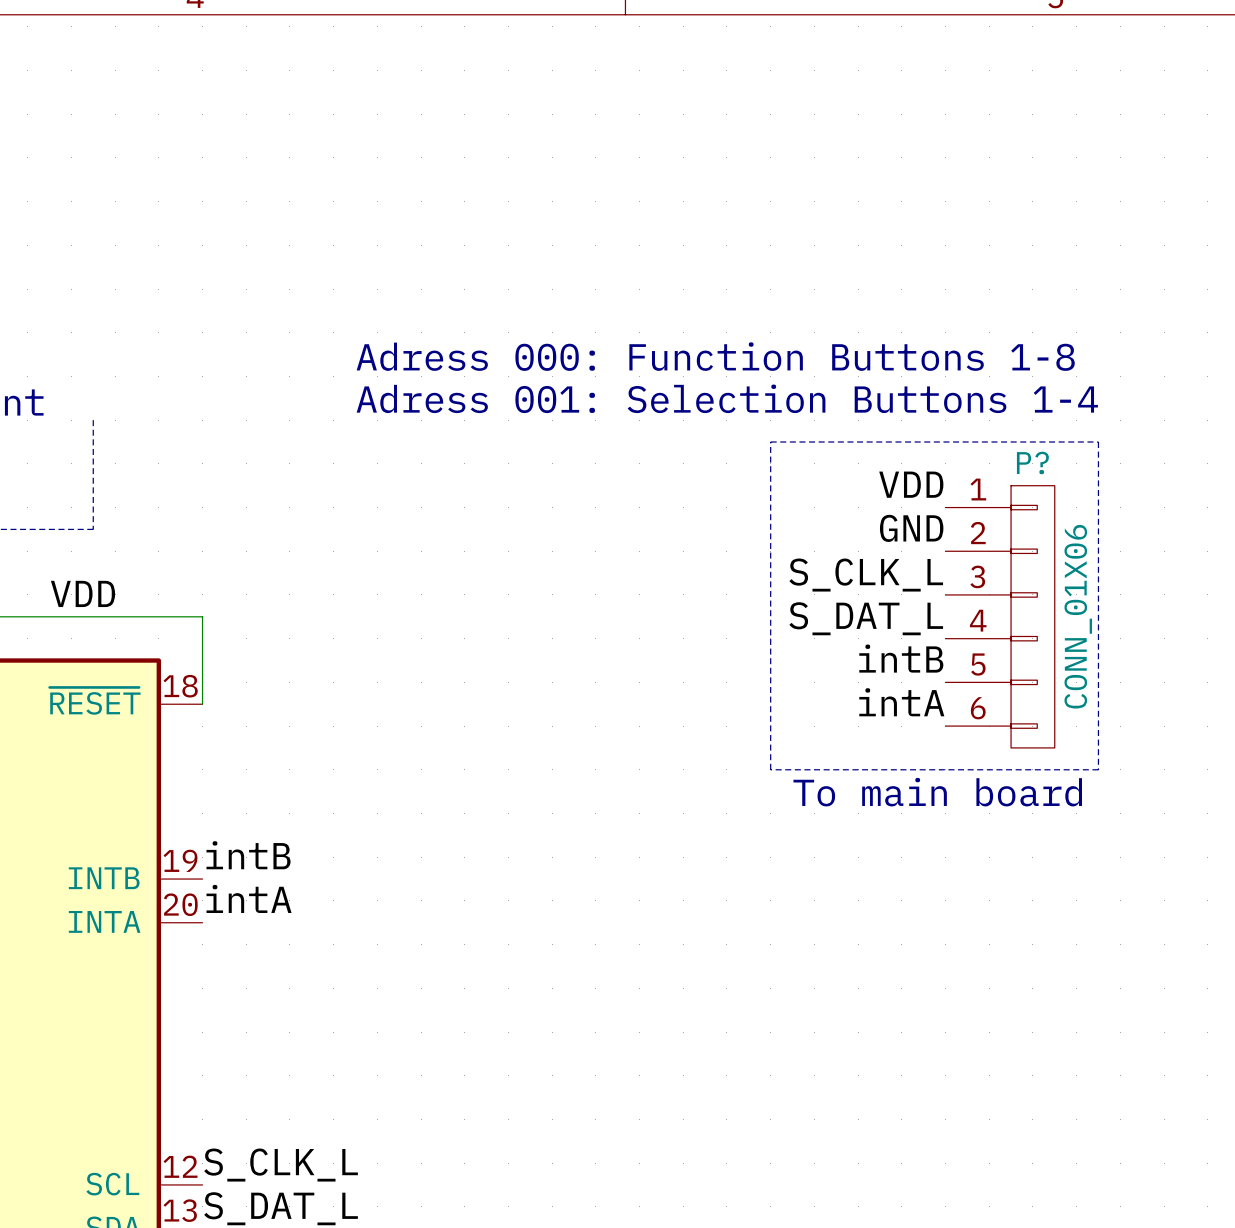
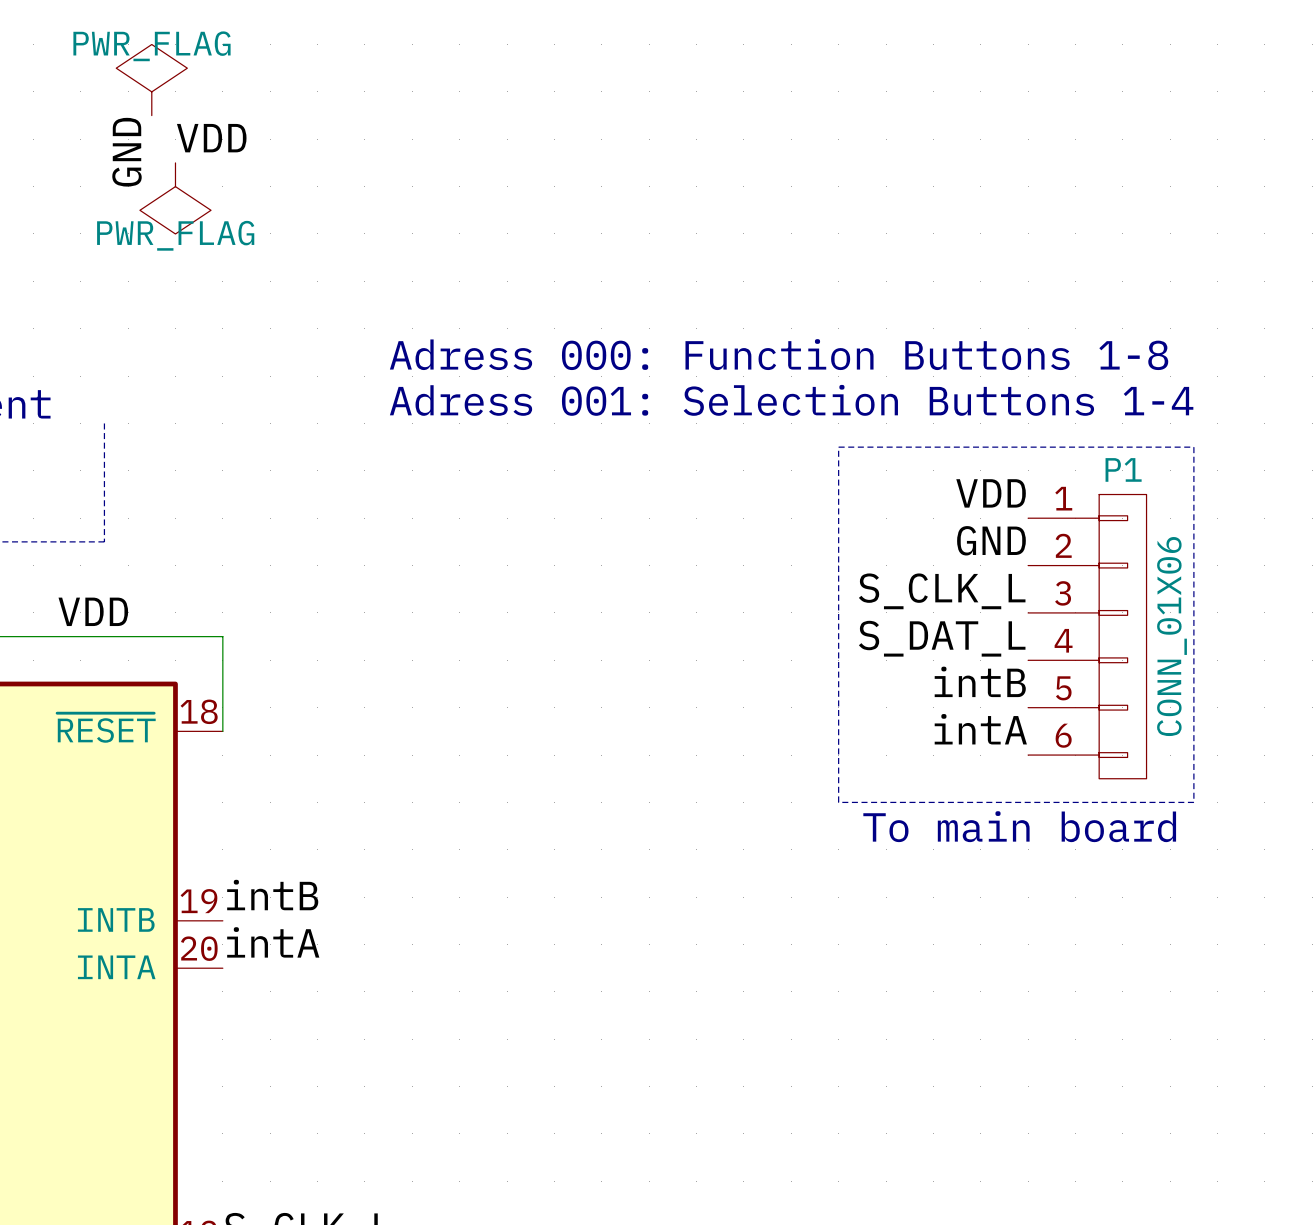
power symbol: none -> PWR_FLAG (151, 80)
label: none -> VDD (211, 138)
label: none -> GND (127, 152)
power symbol: none -> PWR_FLAG (175, 198)
P? name: P? (1032, 462) -> P1 (1123, 469)

